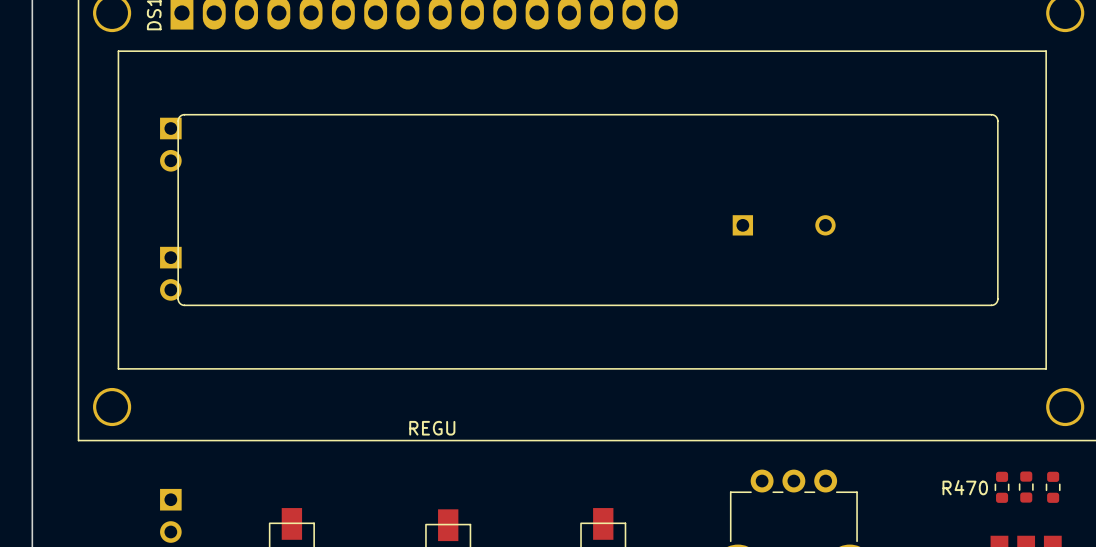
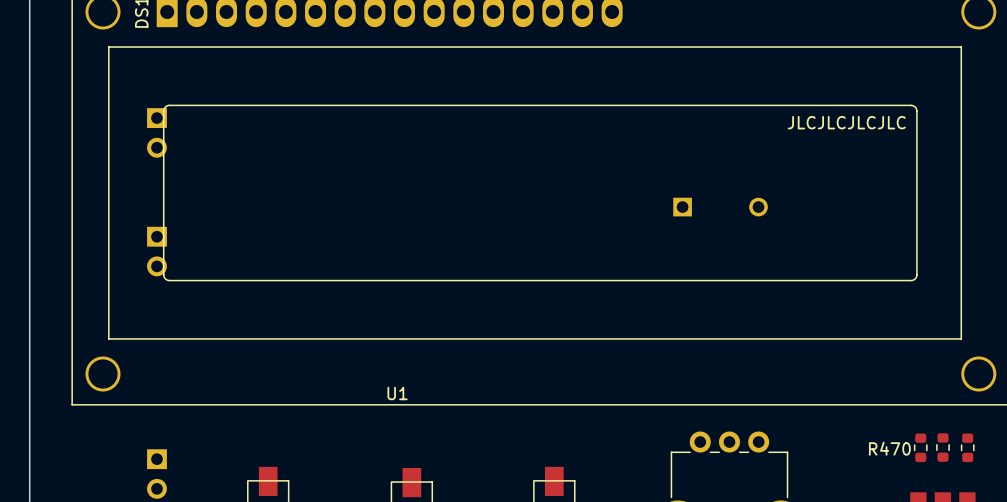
text: none -> JLCJLCJLCJLC (846, 122)
REGU name: REGU (432, 428) -> U1 (397, 393)
R470 name: R470 (965, 487) -> none
text: none -> R470 (889, 448)

